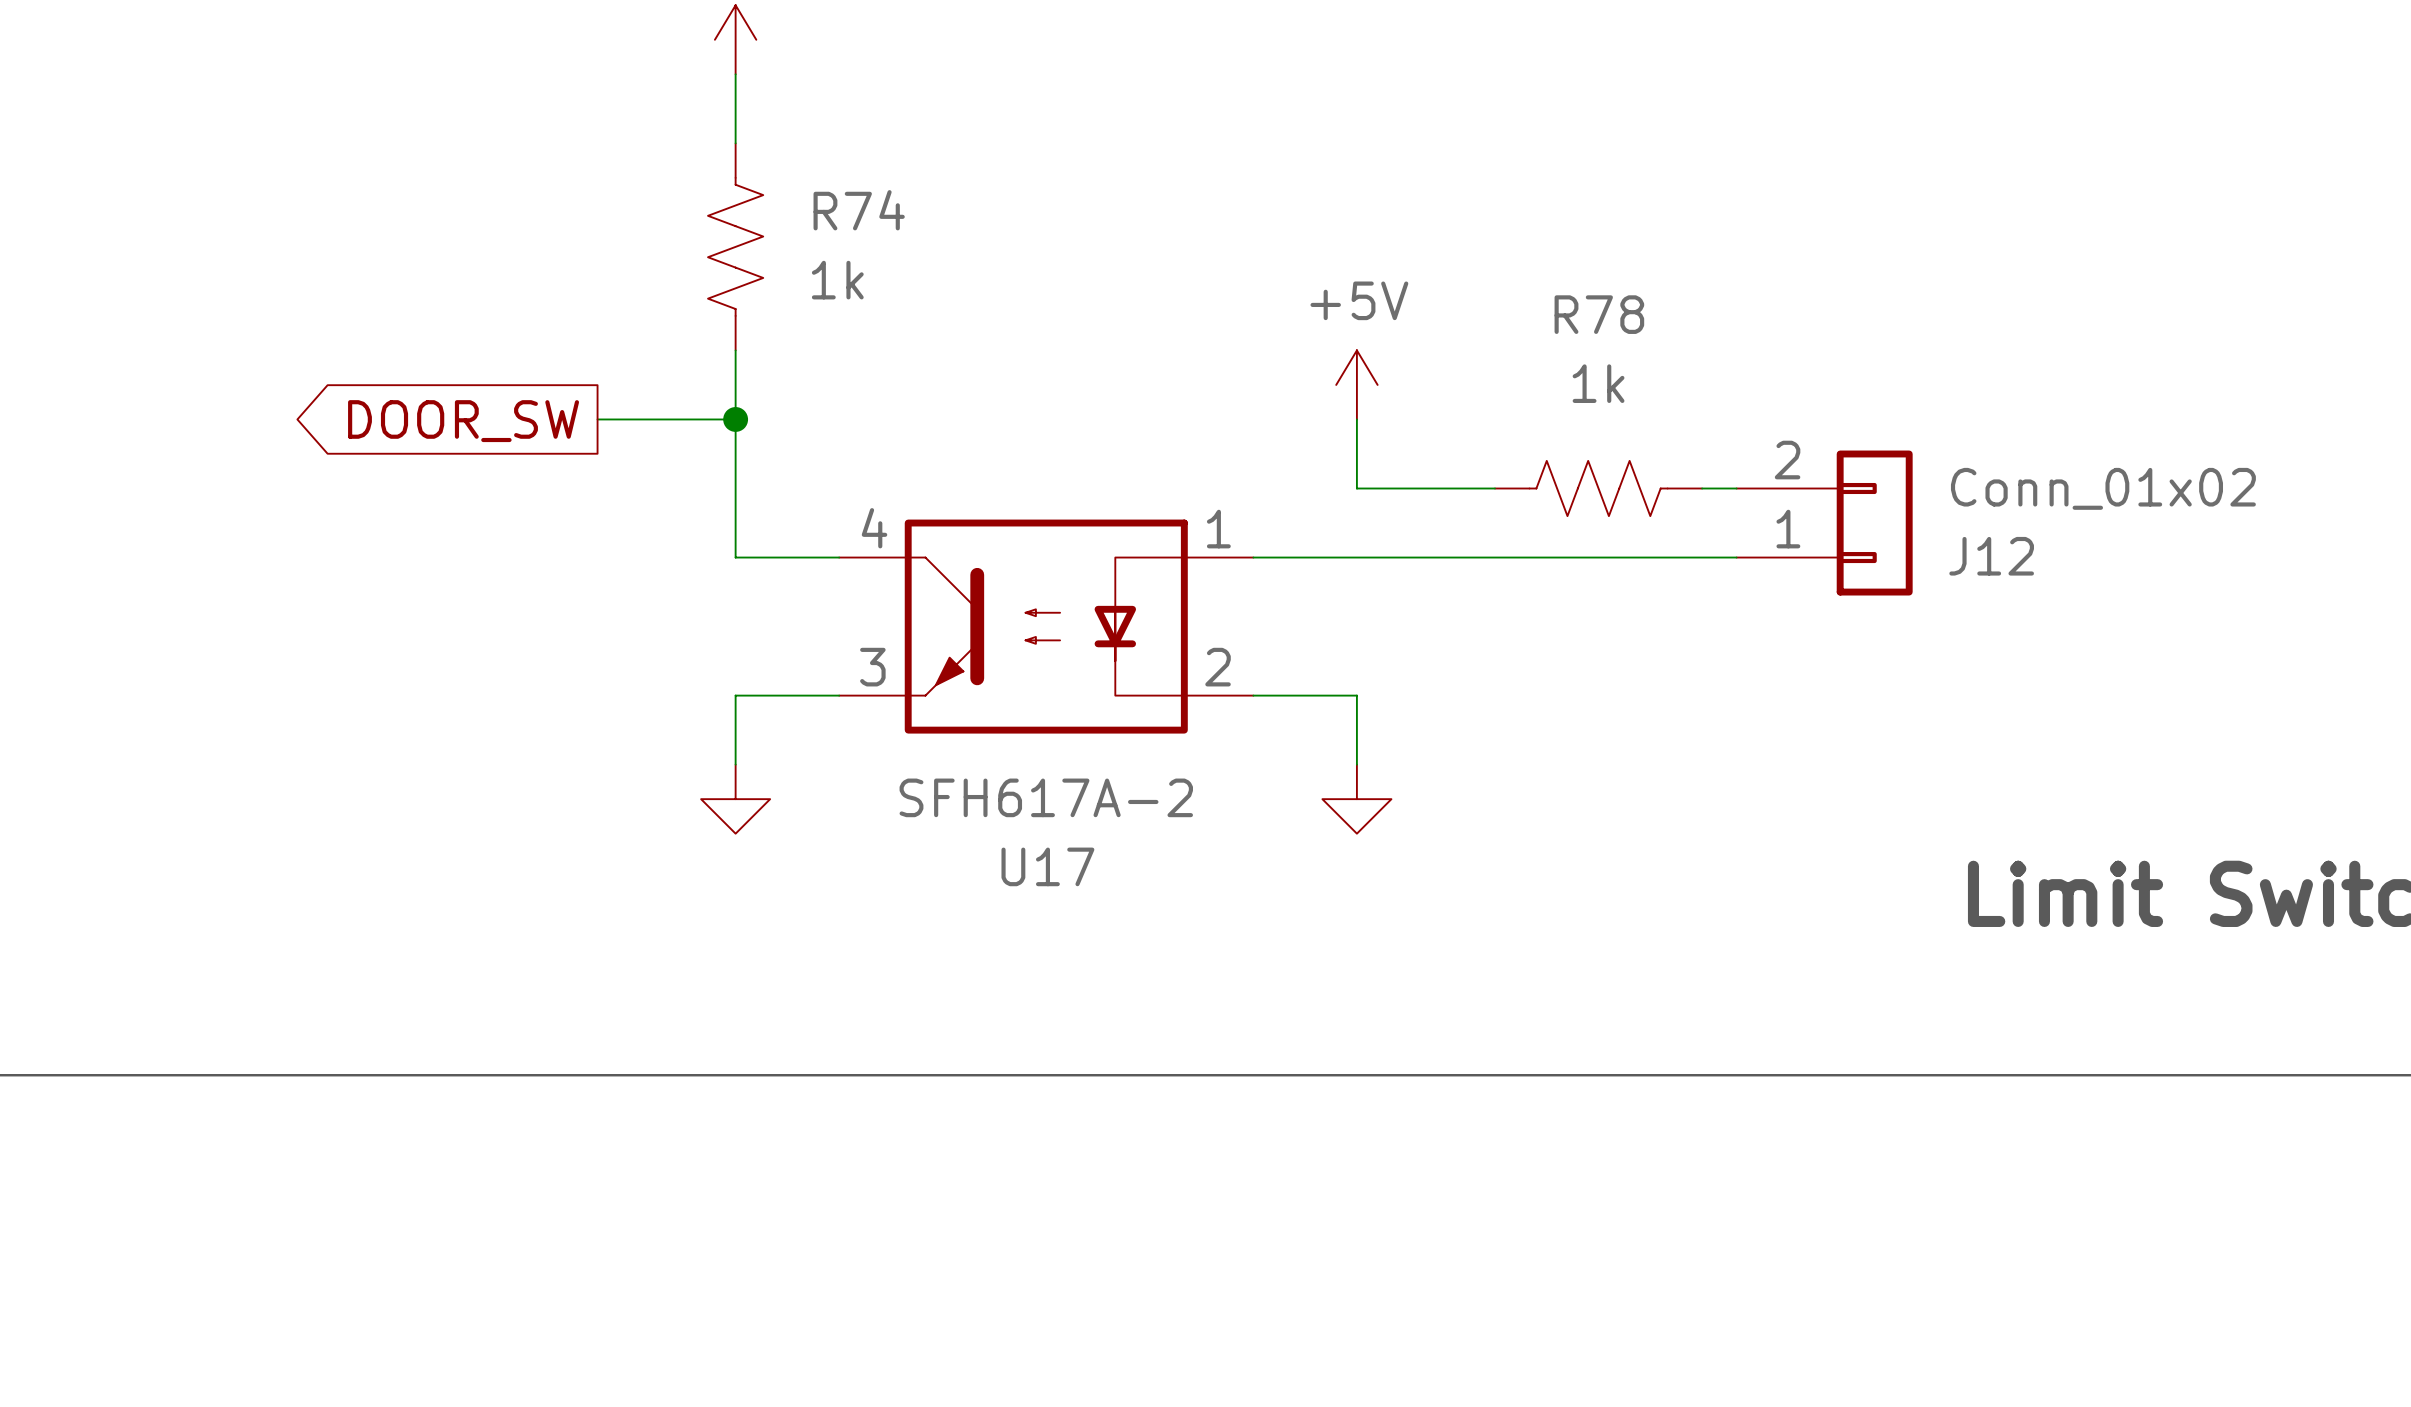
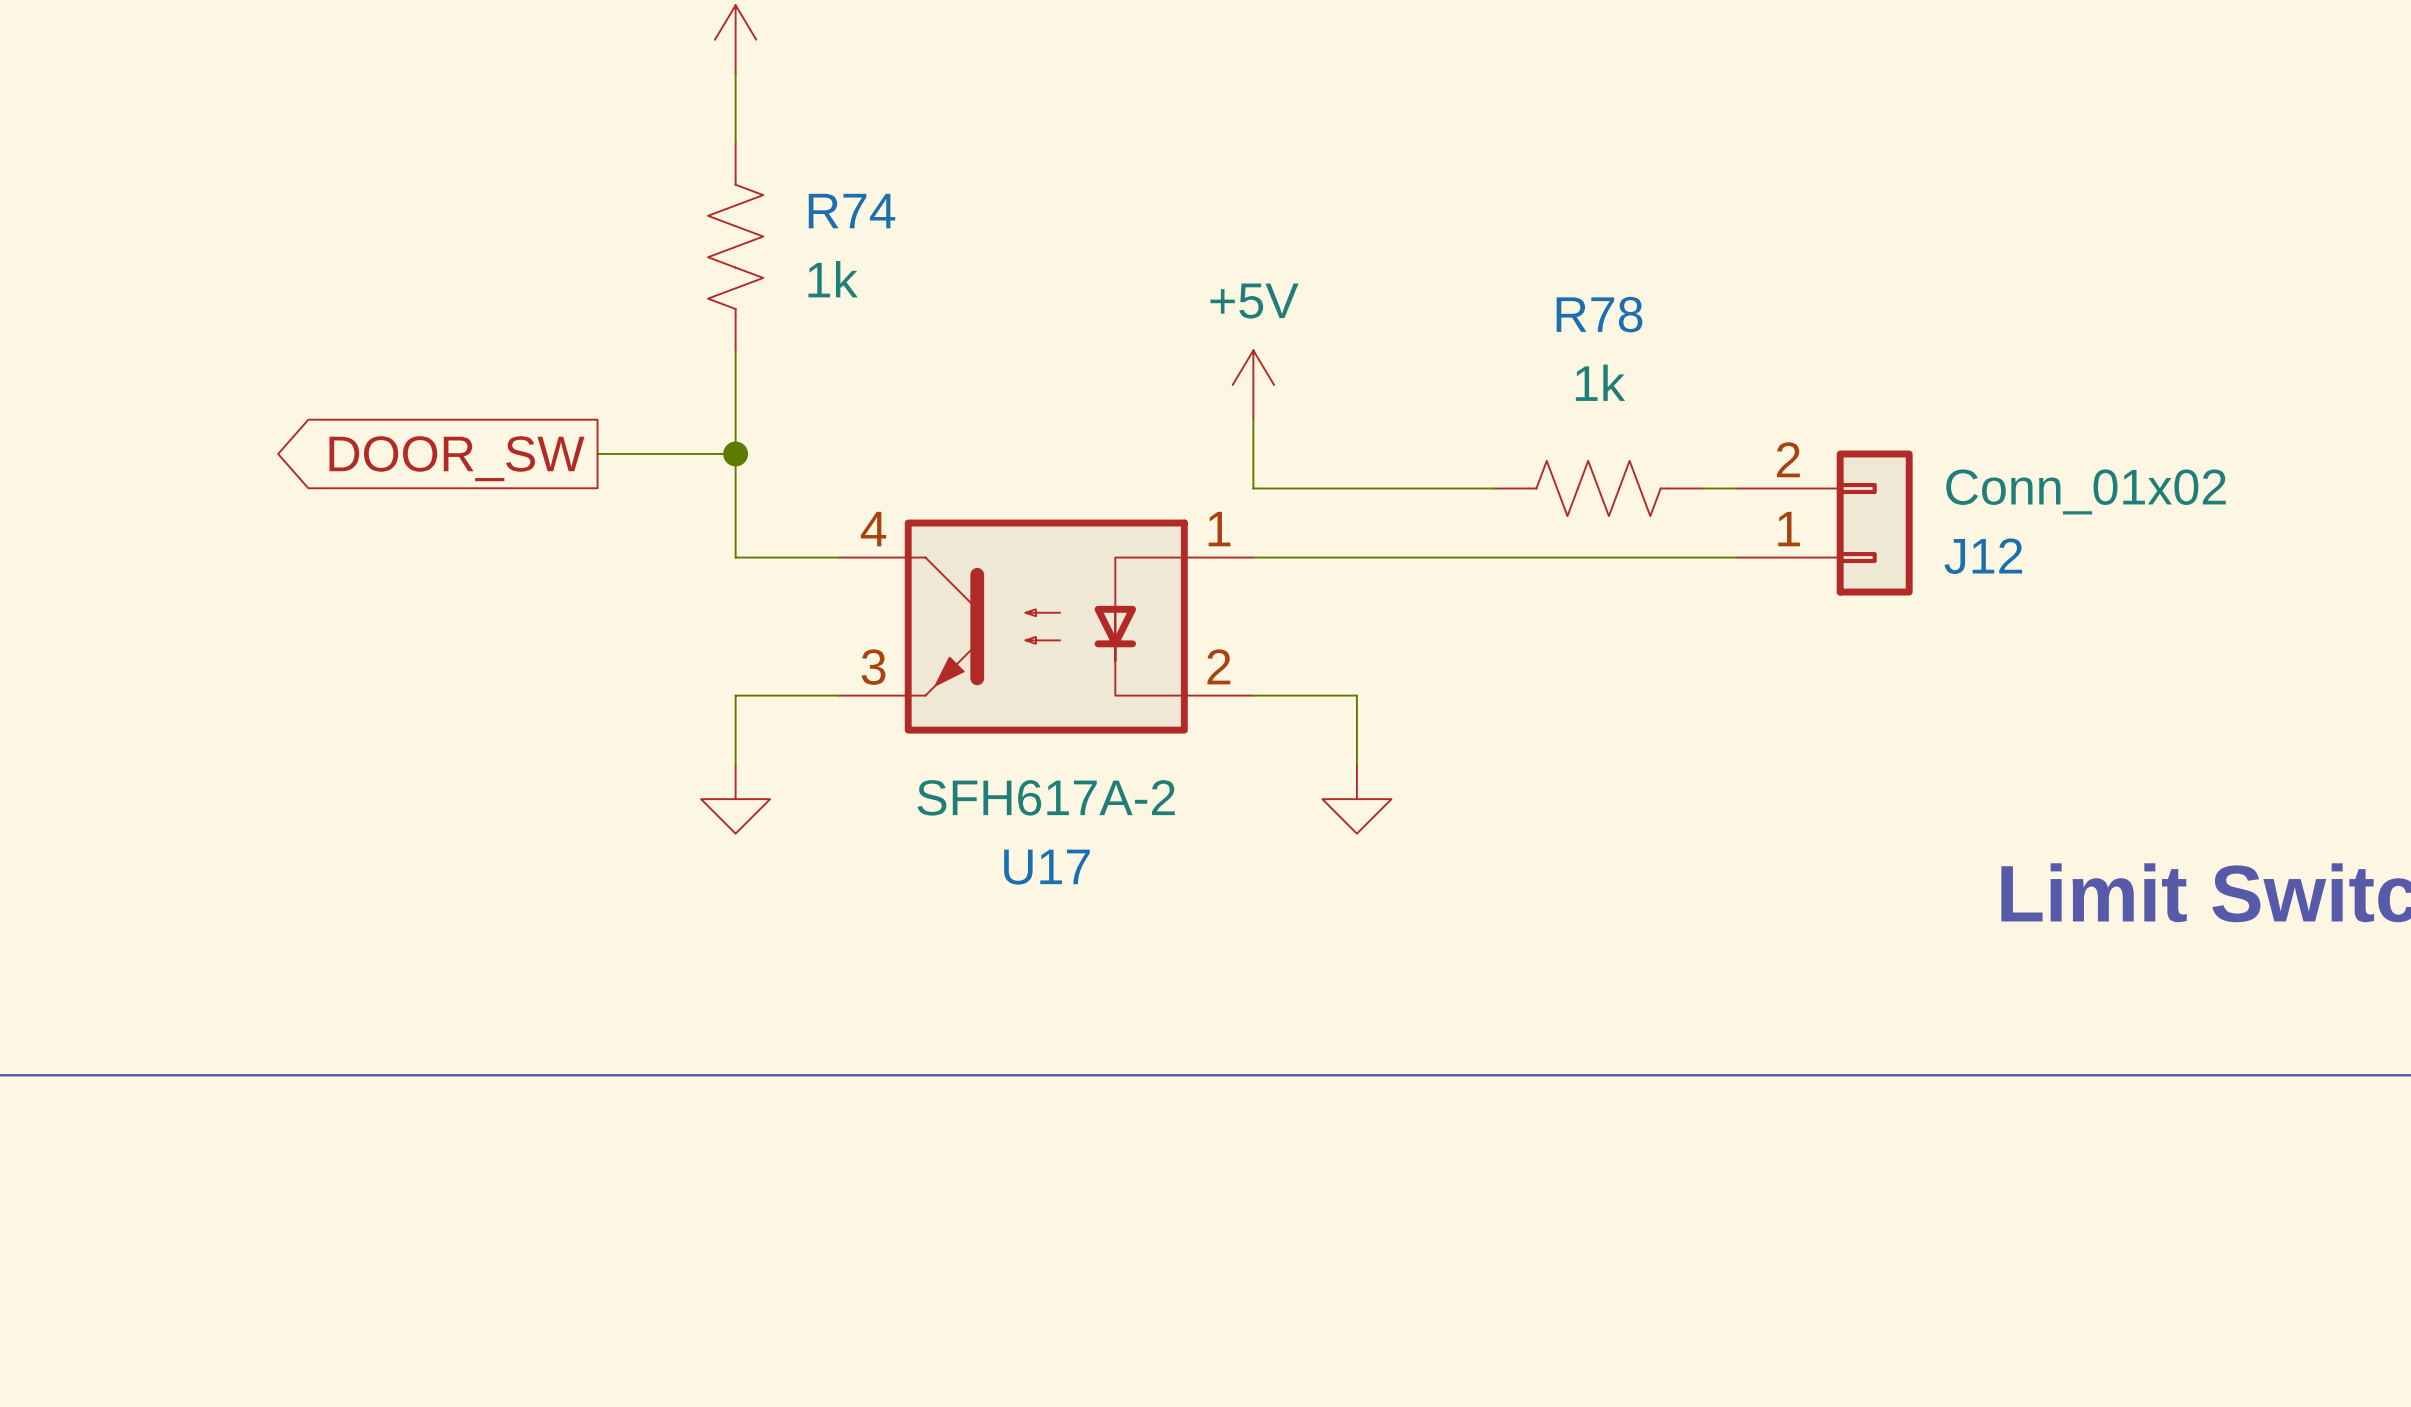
power symbol position: +5V (1356, 384) -> +5V (1253, 384)
wire: (597, 419) (735, 419) -> (597, 453) (735, 453)
junction position: (735, 419) -> (735, 453)
wire: (1356, 419) (1356, 488) -> (1253, 419) (1253, 488) (1356, 488)
global label position: DOOR_SW (463, 421) -> DOOR_SW (456, 458)

